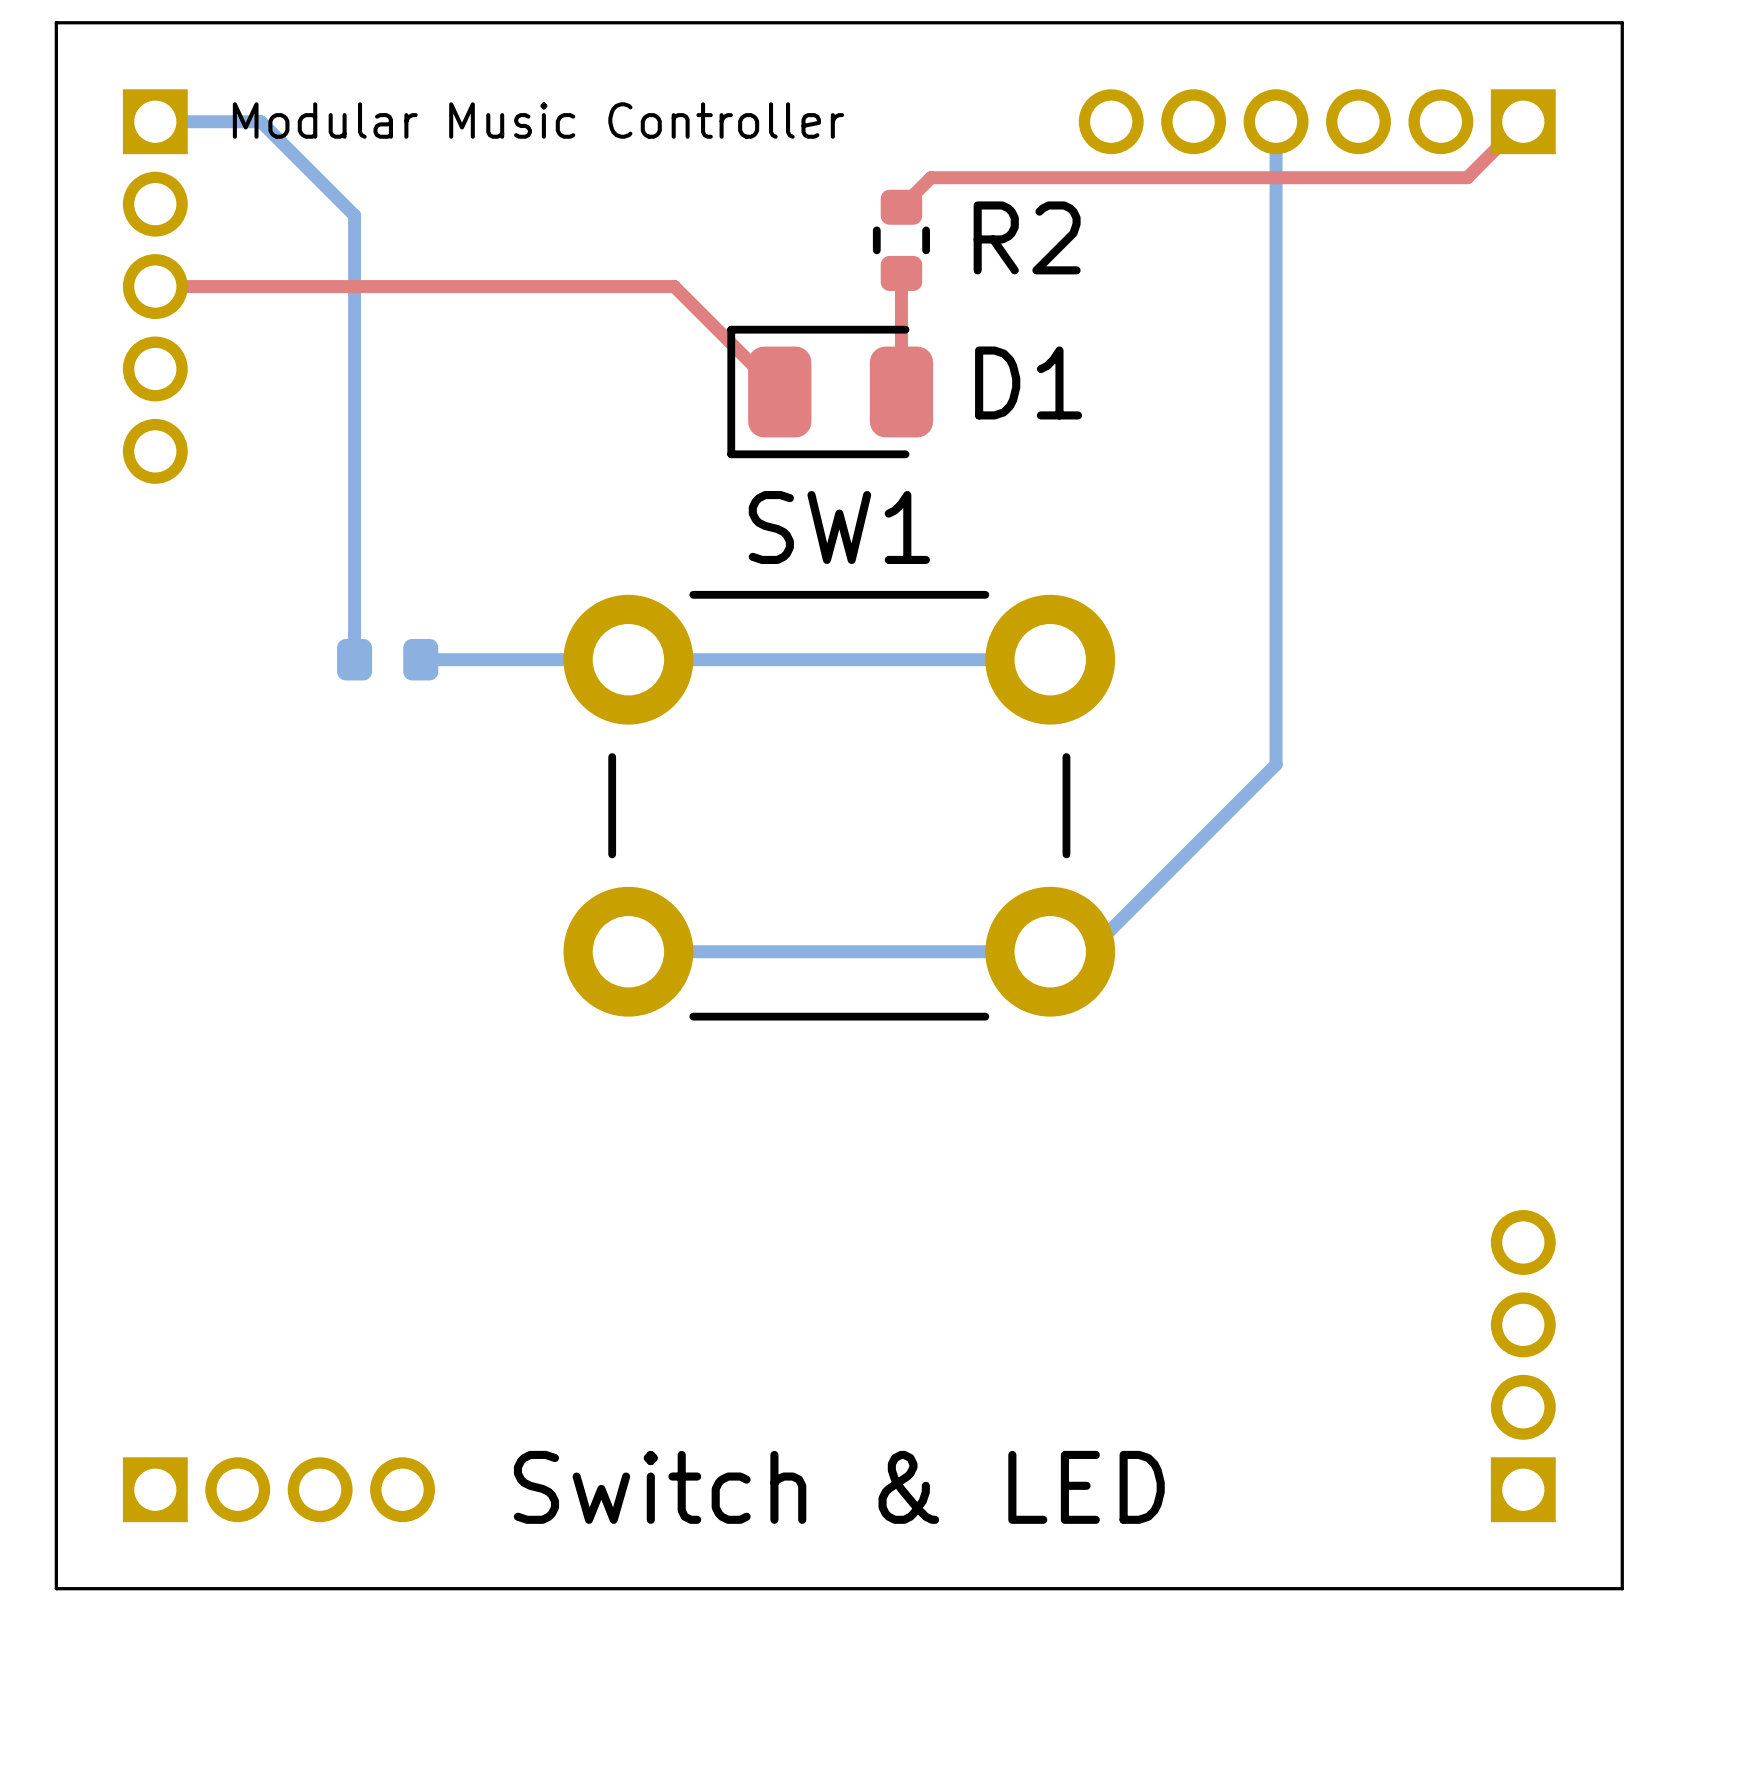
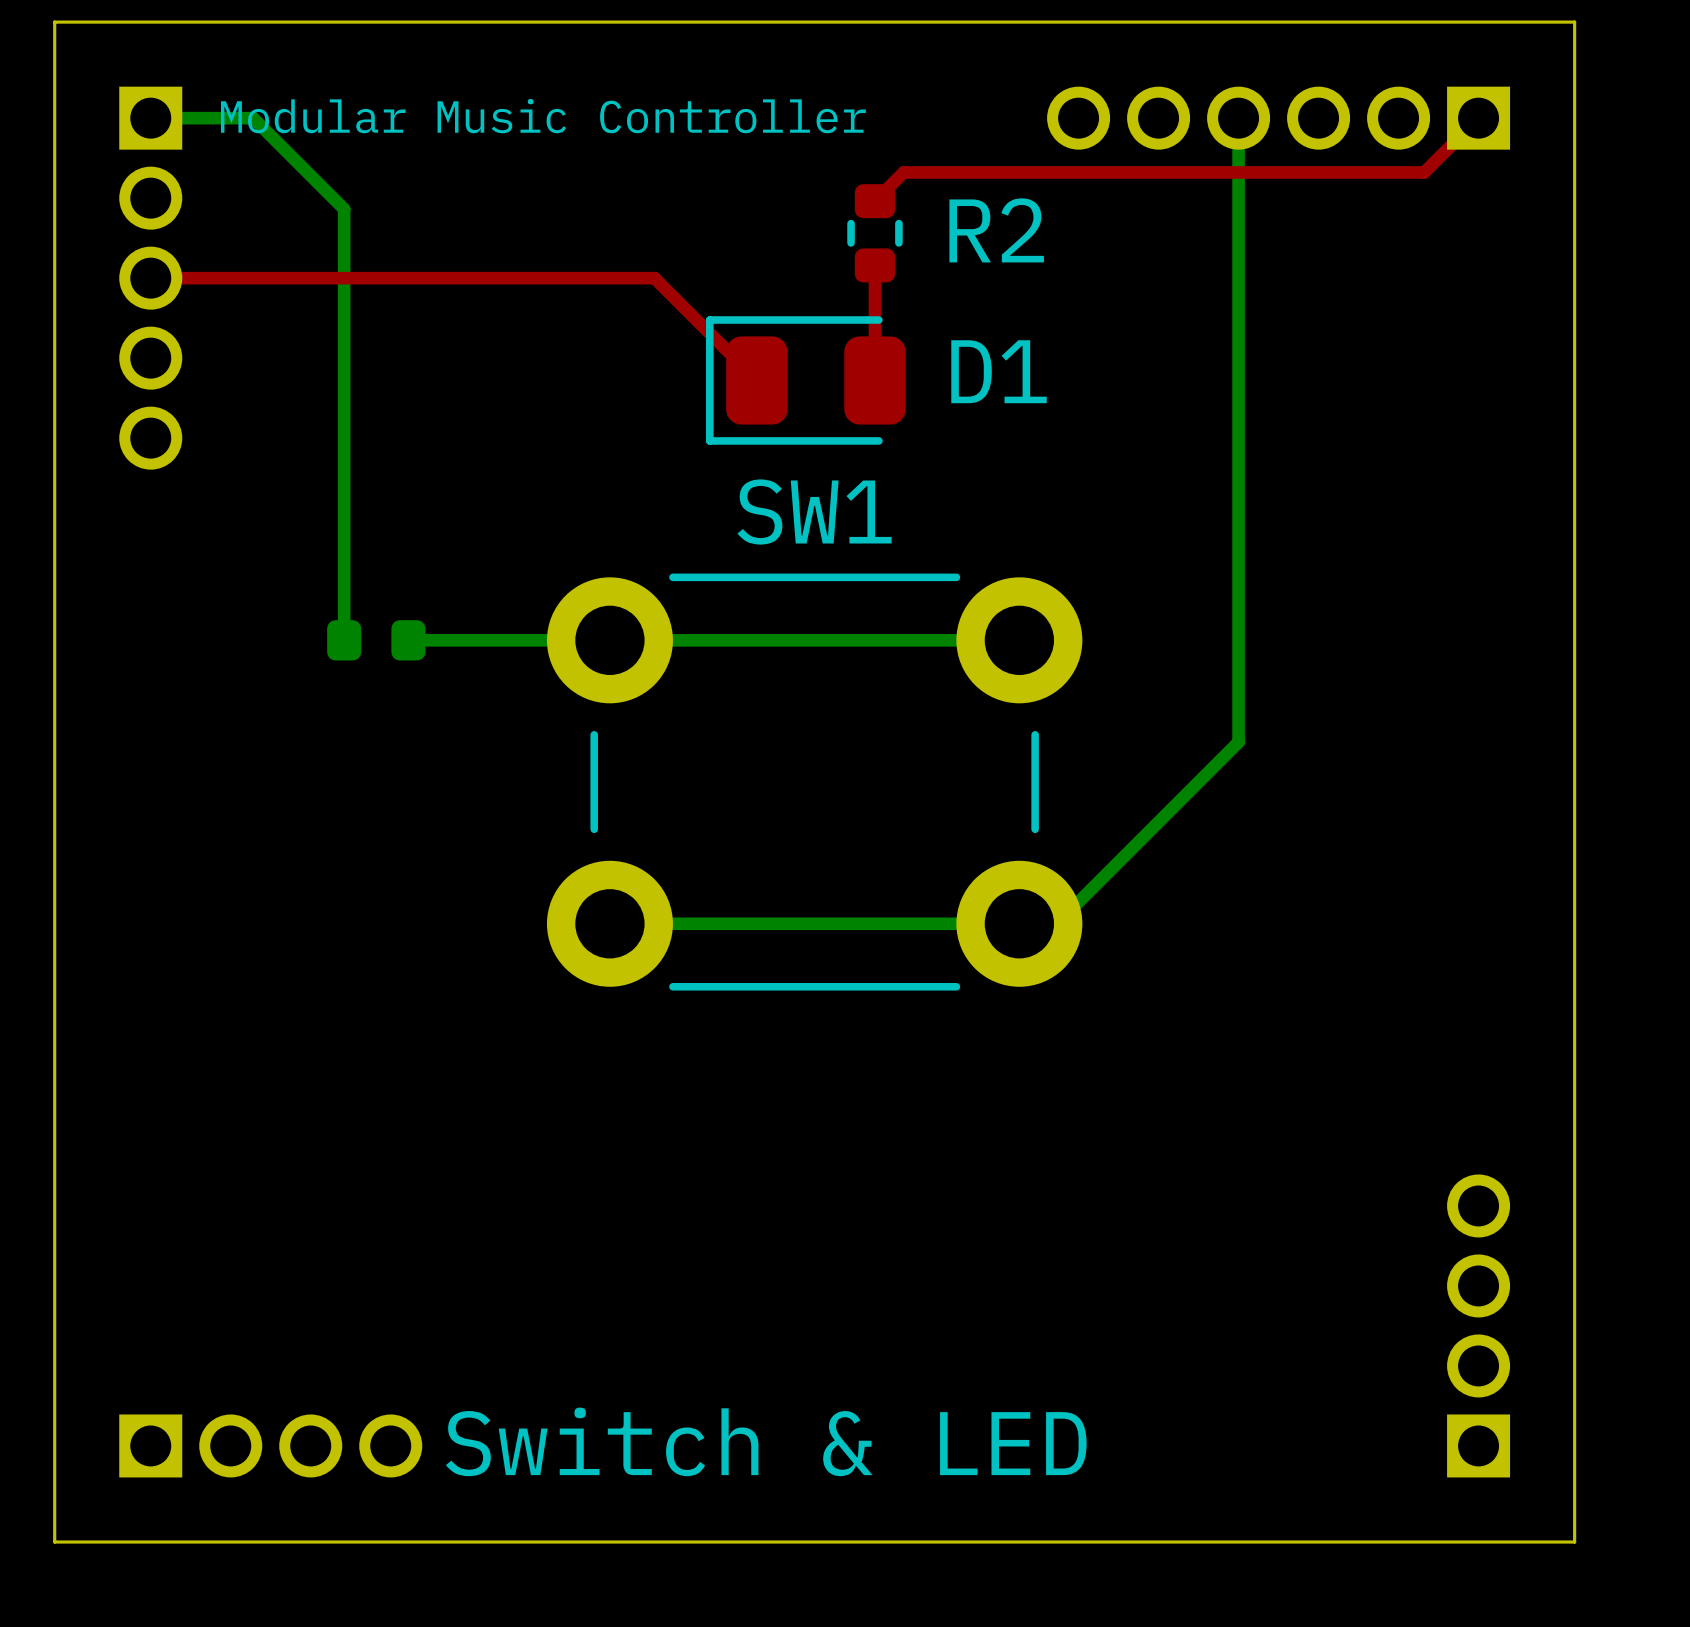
text position: Switch & LED (839, 1487) -> Switch & LED (766, 1441)

